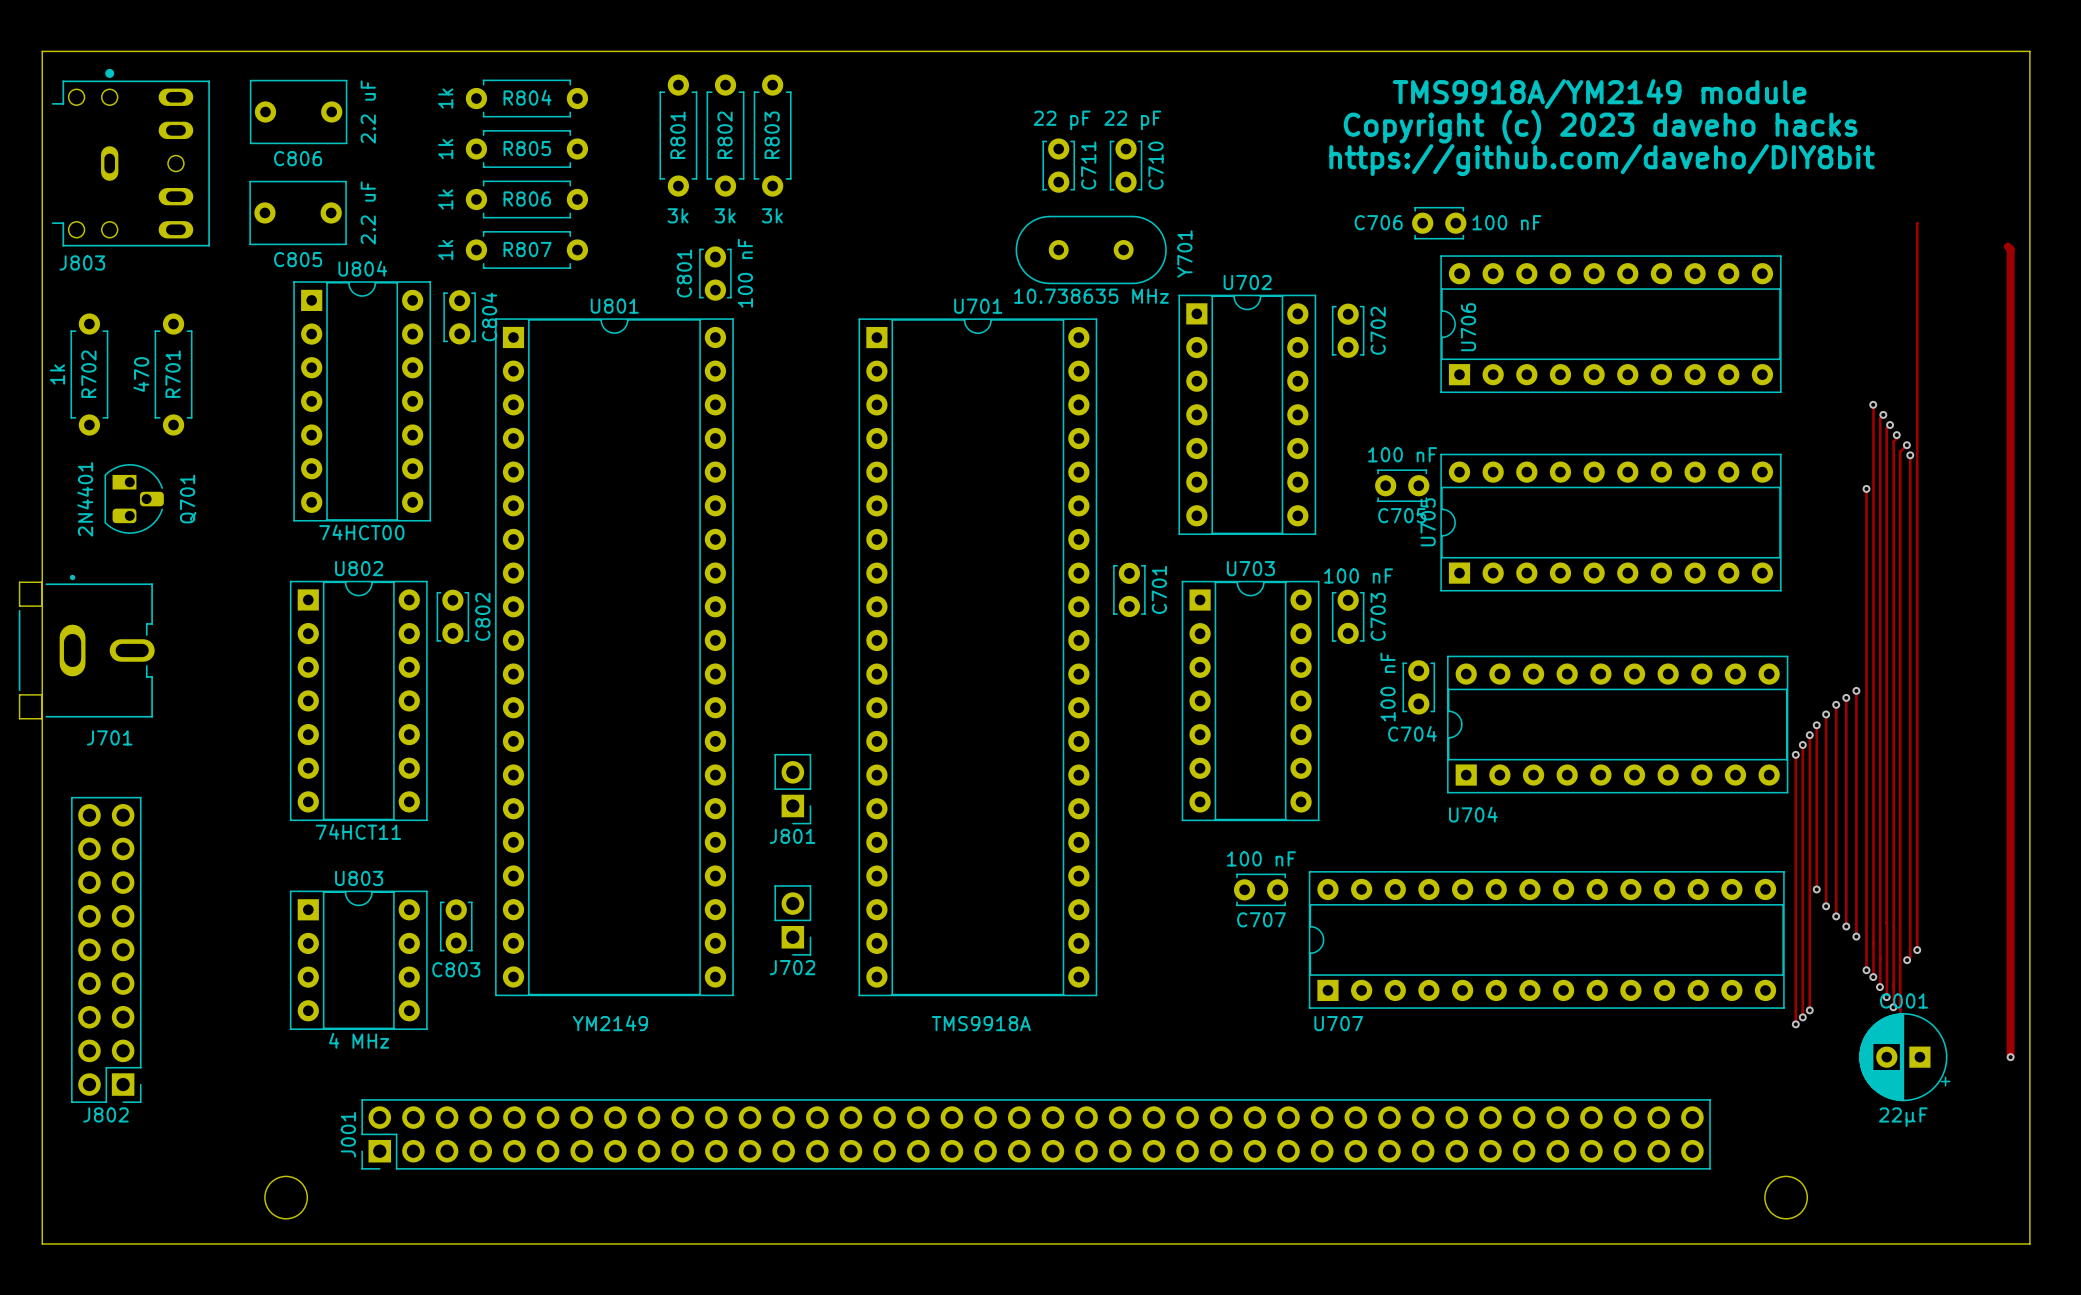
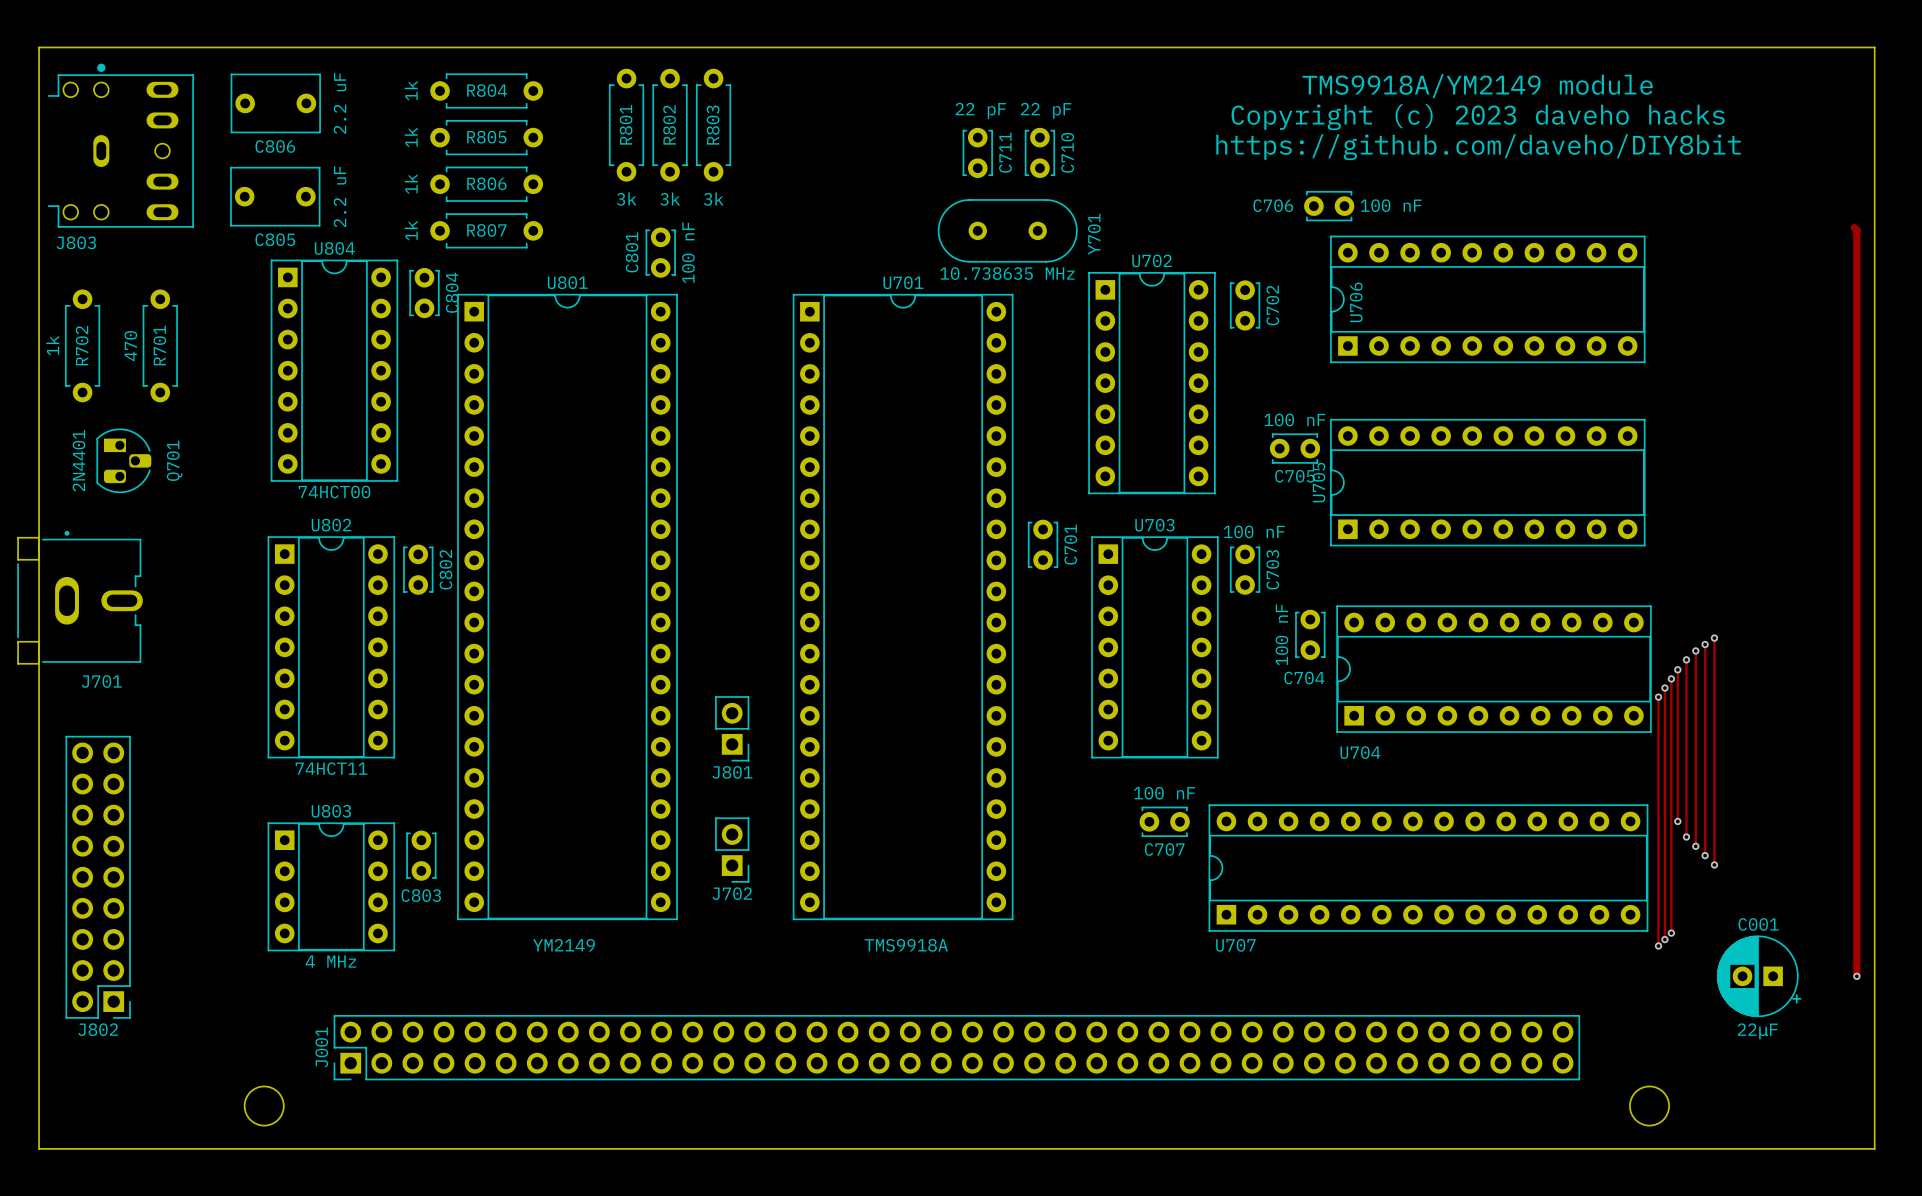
track: (1916, 223) (1917, 950) -> none
track: (1873, 404) (1873, 976) -> none
via: (1873, 404) -> none
track: (1883, 414) (1880, 417) (1879, 987) -> none
via: (1883, 414) -> none
track: (1890, 425) (1886, 428) (1886, 997) -> none
via: (1890, 425) -> none
track: (1896, 435) (1893, 441) (1893, 1007) -> none
via: (1896, 435) -> none
track: (1906, 445) (1900, 451) (1900, 1017) -> none
via: (1906, 445) -> none
track: (1910, 455) (1910, 957) (1907, 960) -> none
via: (1910, 455) -> none
track: (1866, 488) (1866, 970) -> none
via: (1866, 488) -> none
via: (1917, 950) -> none
via: (1907, 960) -> none
via: (1866, 970) -> none
via: (1873, 977) -> none
via: (1879, 987) -> none
via: (1886, 997) -> none
via: (1893, 1007) -> none

